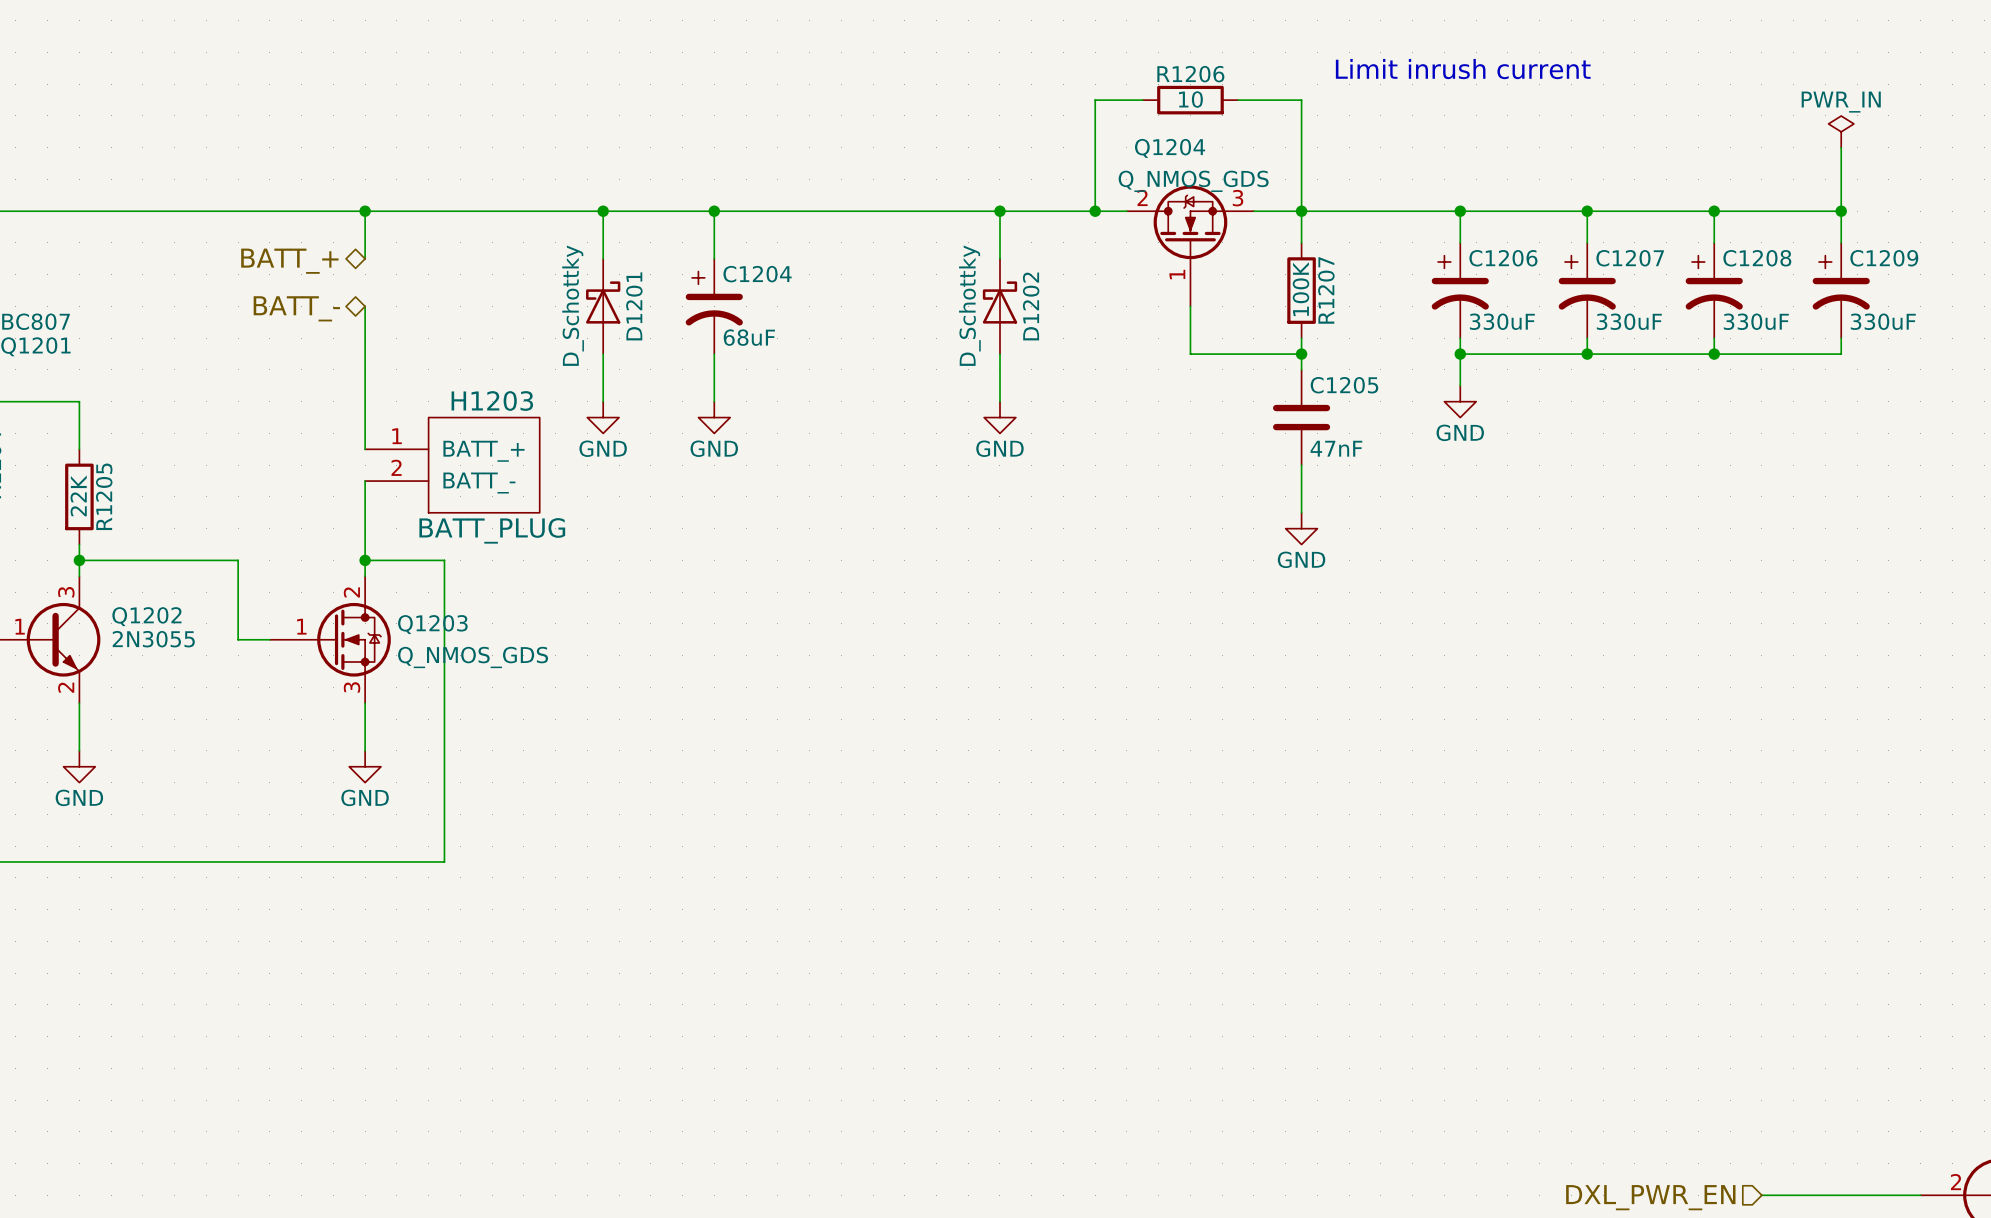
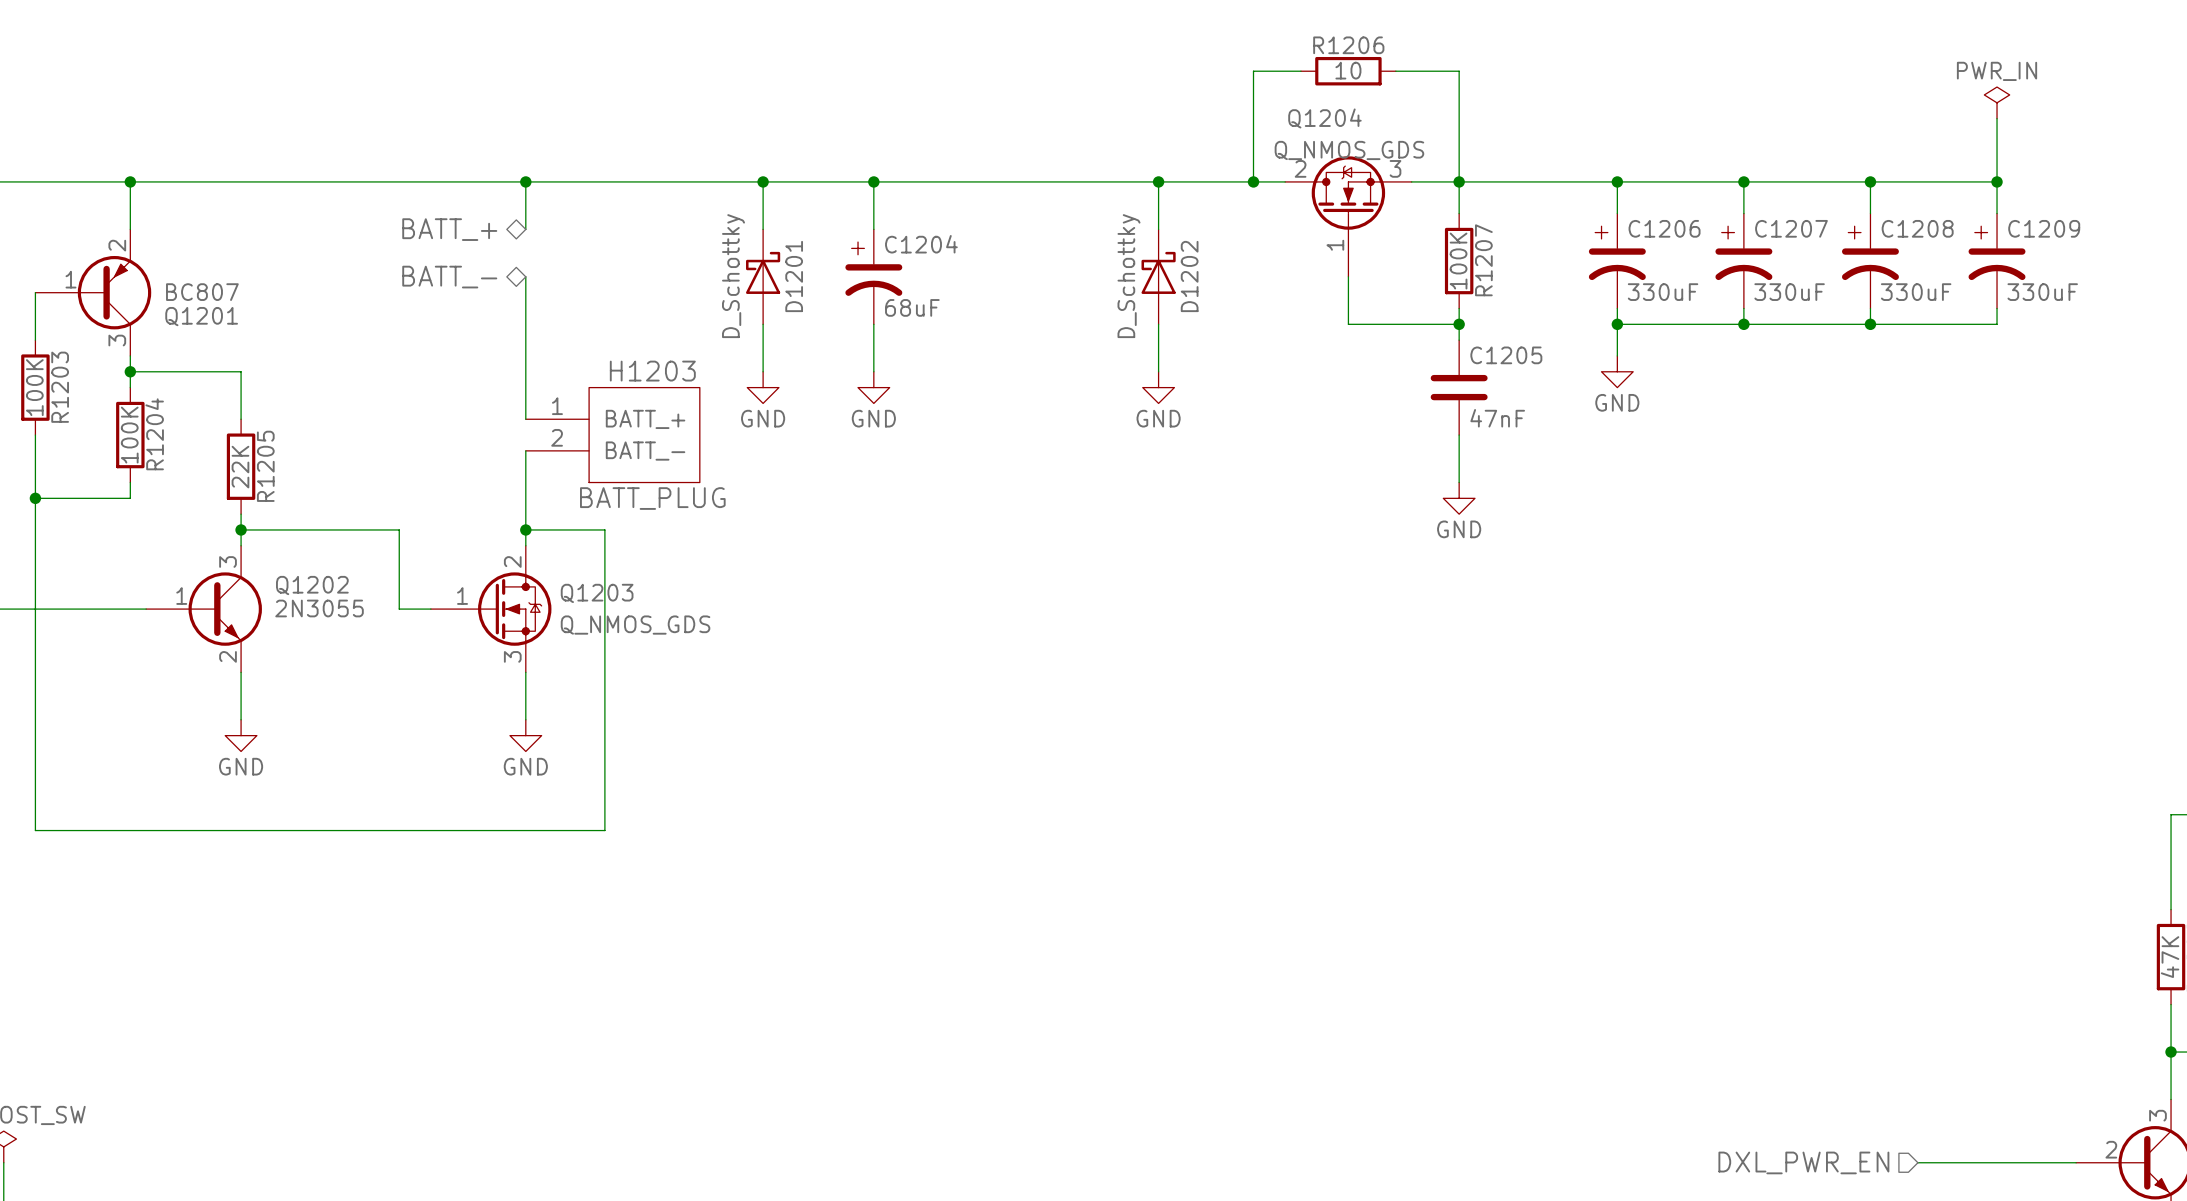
text: Limit inrush current (1463, 69) -> none

